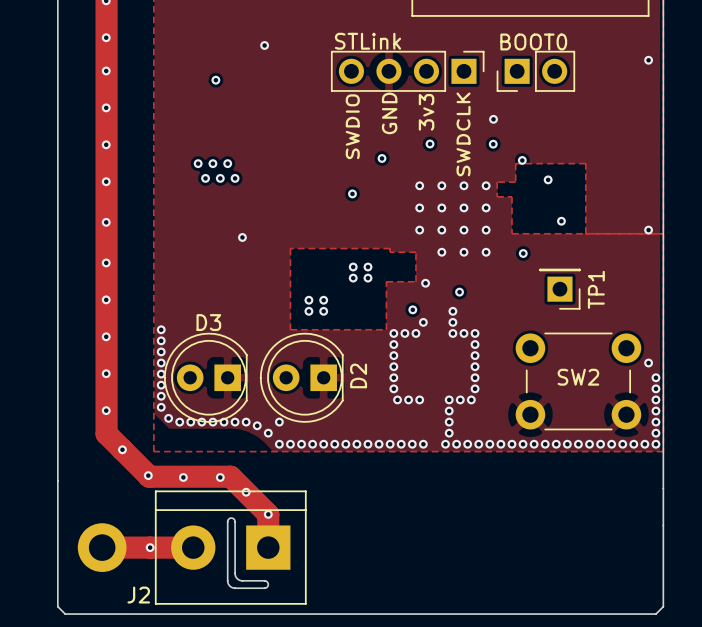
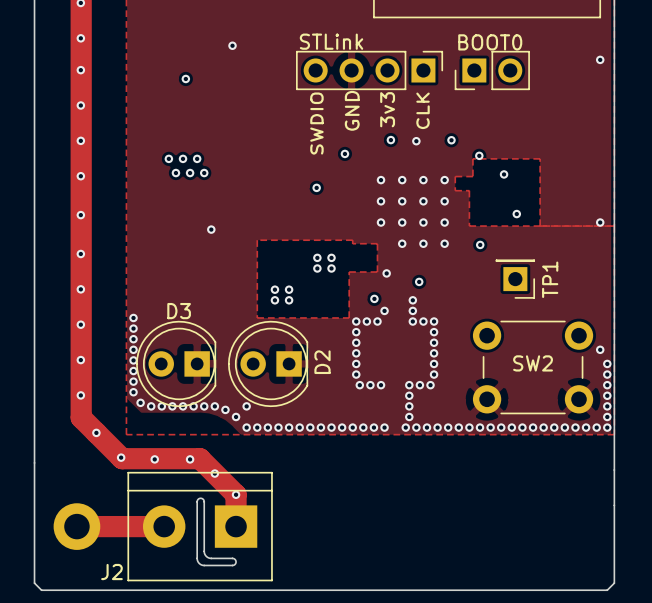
via position: (493, 119) -> (416, 141)
text: SWDCLK (463, 134) -> CLK (423, 110)
via: (150, 547) -> none

